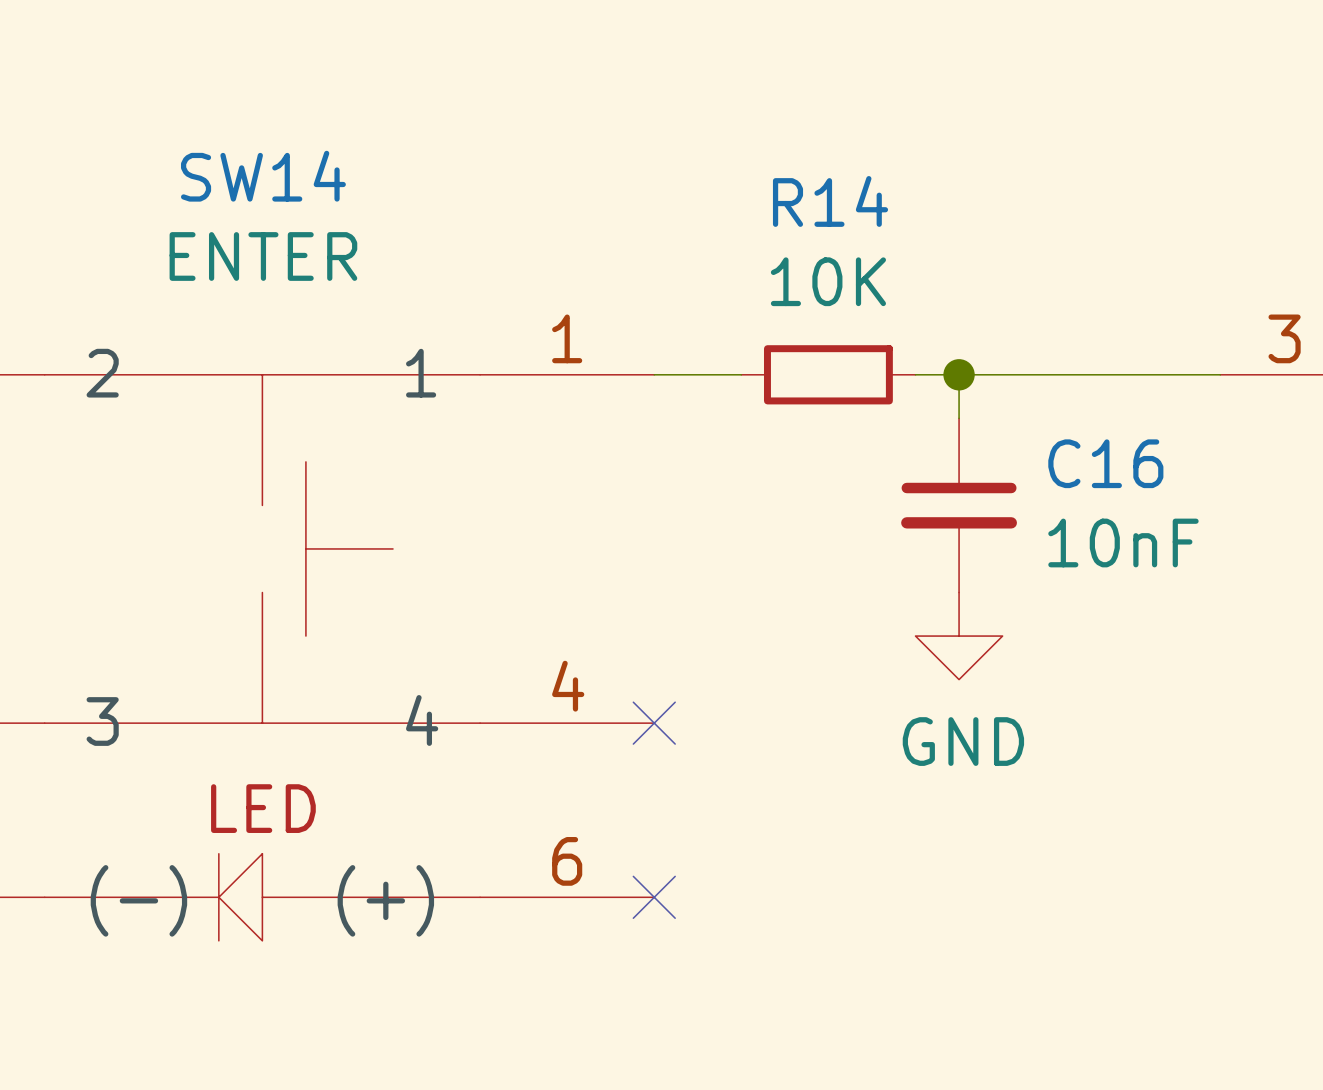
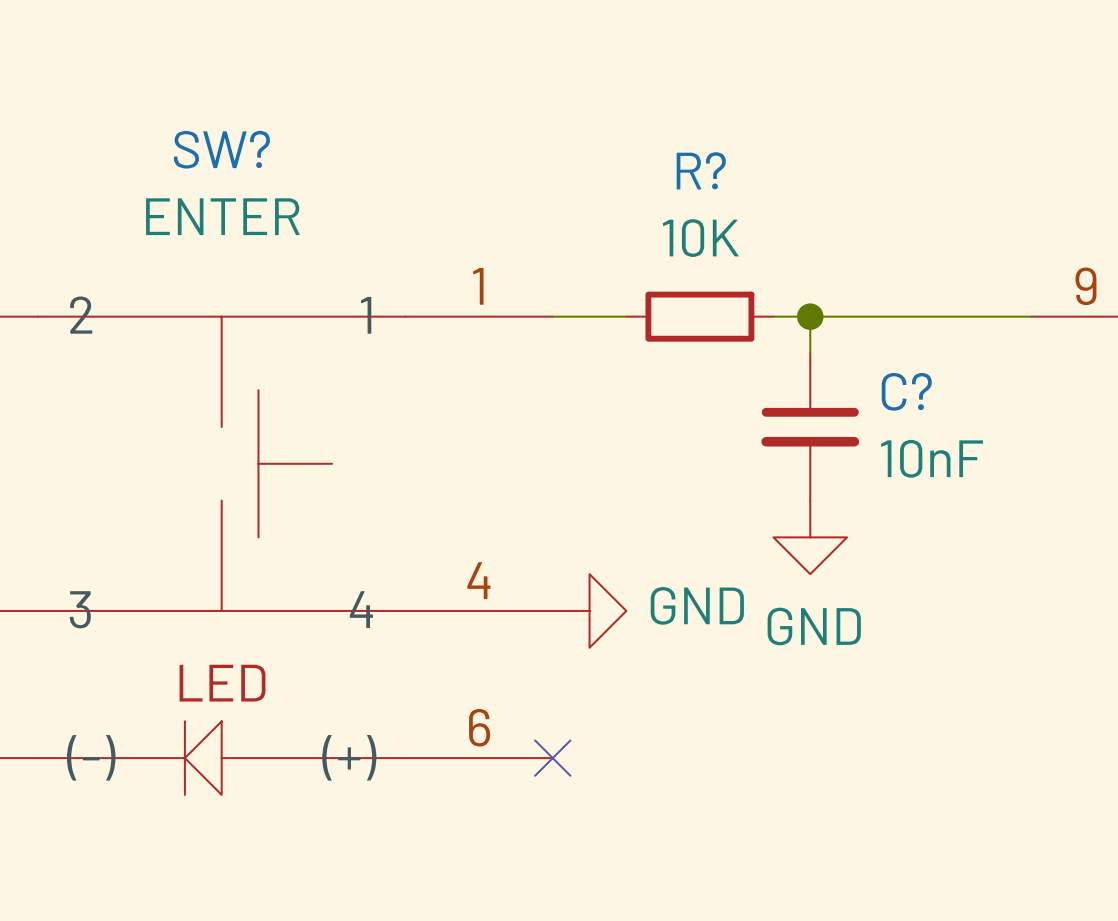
SW14 name: SW14 (263, 176) -> SW? (221, 149)
R14 name: R14 (830, 201) -> R? (701, 170)
part pin number: 3 (1284, 338) -> 9 (1085, 286)
C16 name: C16 (1105, 463) -> C? (906, 391)
no-connect mark: (654, 723) -> none
power symbol: none -> GND (589, 610)

